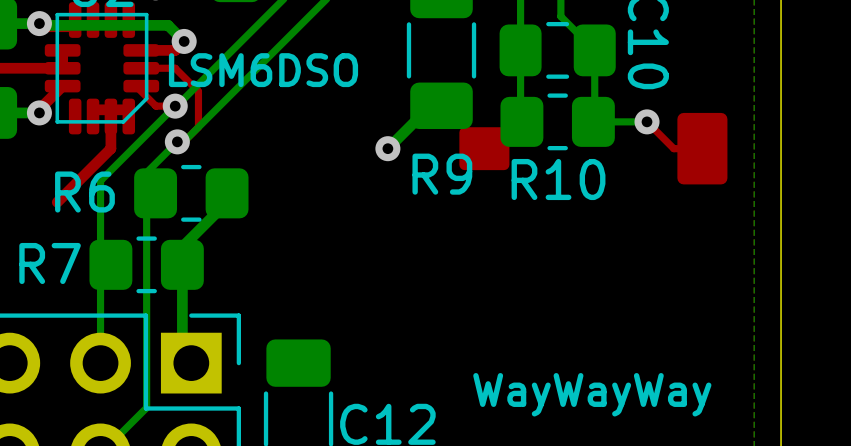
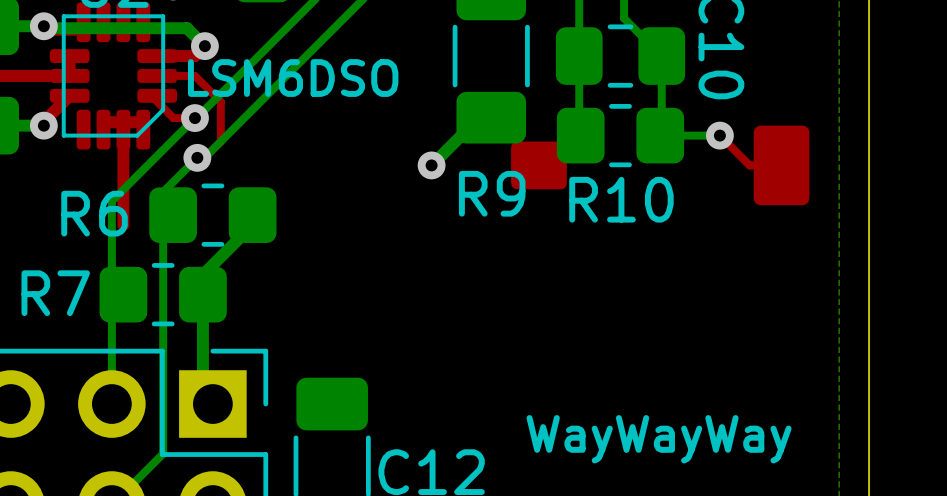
top track: (110, 148) (57, 202) -> (123, 165) (123, 225)

